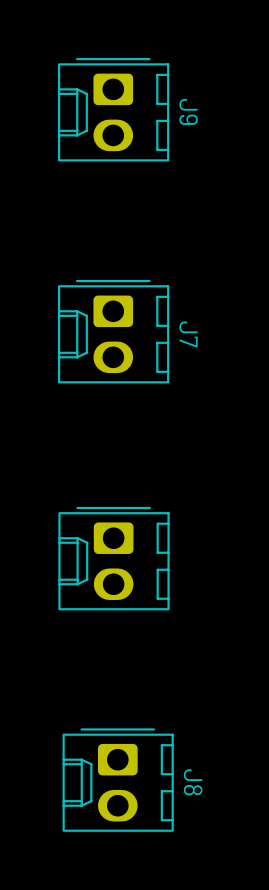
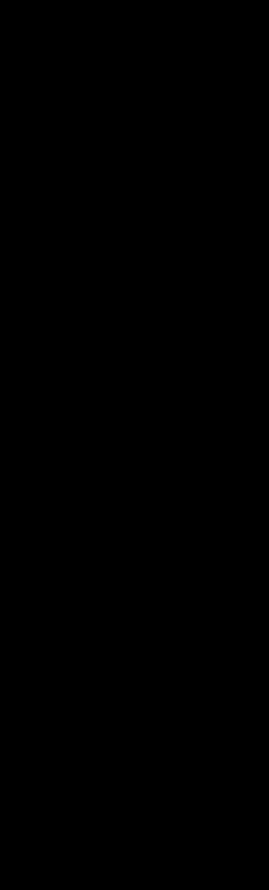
J9: (113, 109) -> none
J7: (113, 331) -> none
part: (114, 558) -> none
J8: (118, 780) -> none

